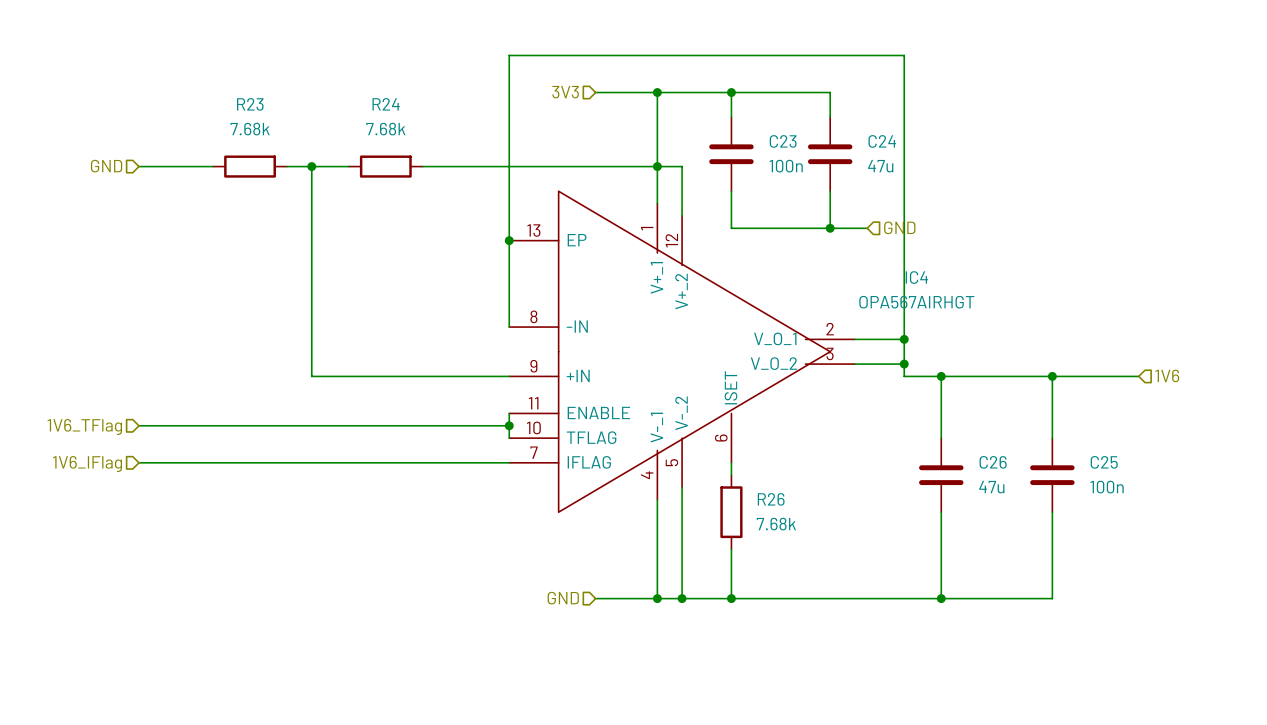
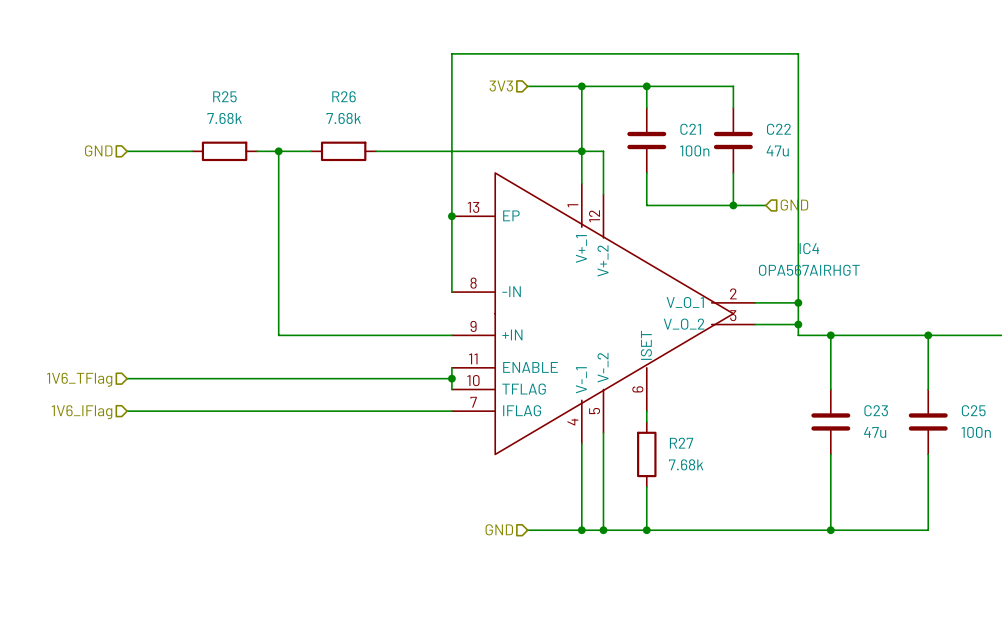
R23 name: R23 (250, 104) -> R25 (224, 96)
R24 name: R24 (386, 104) -> R26 (344, 96)
C23 name: C23 (783, 141) -> C21 (690, 129)
C24 name: C24 (882, 141) -> C22 (778, 129)
C26 name: C26 (993, 462) -> C23 (876, 410)
R26 name: R26 (771, 499) -> R27 (681, 443)

